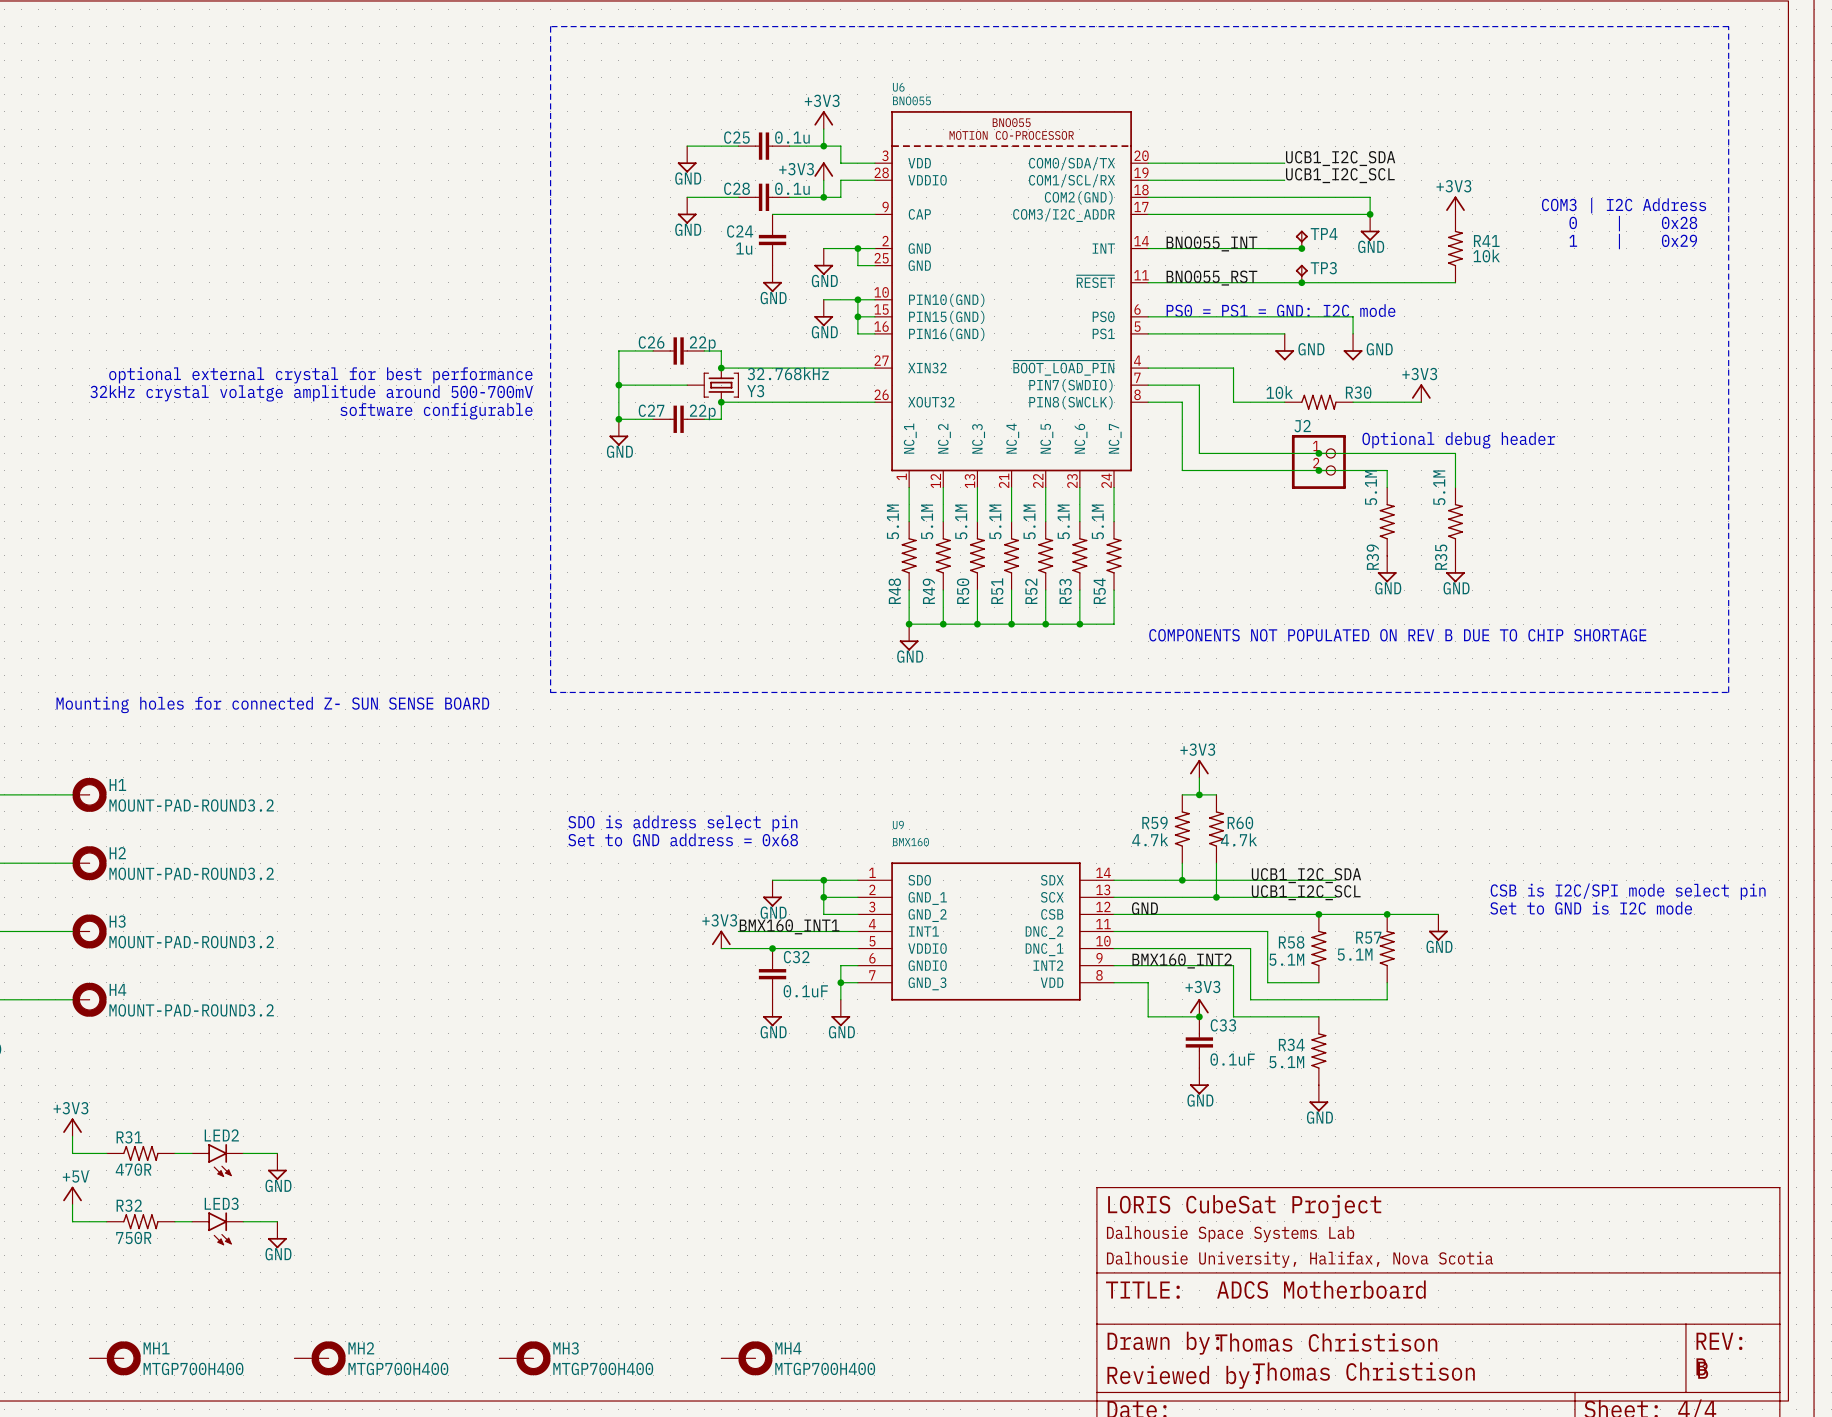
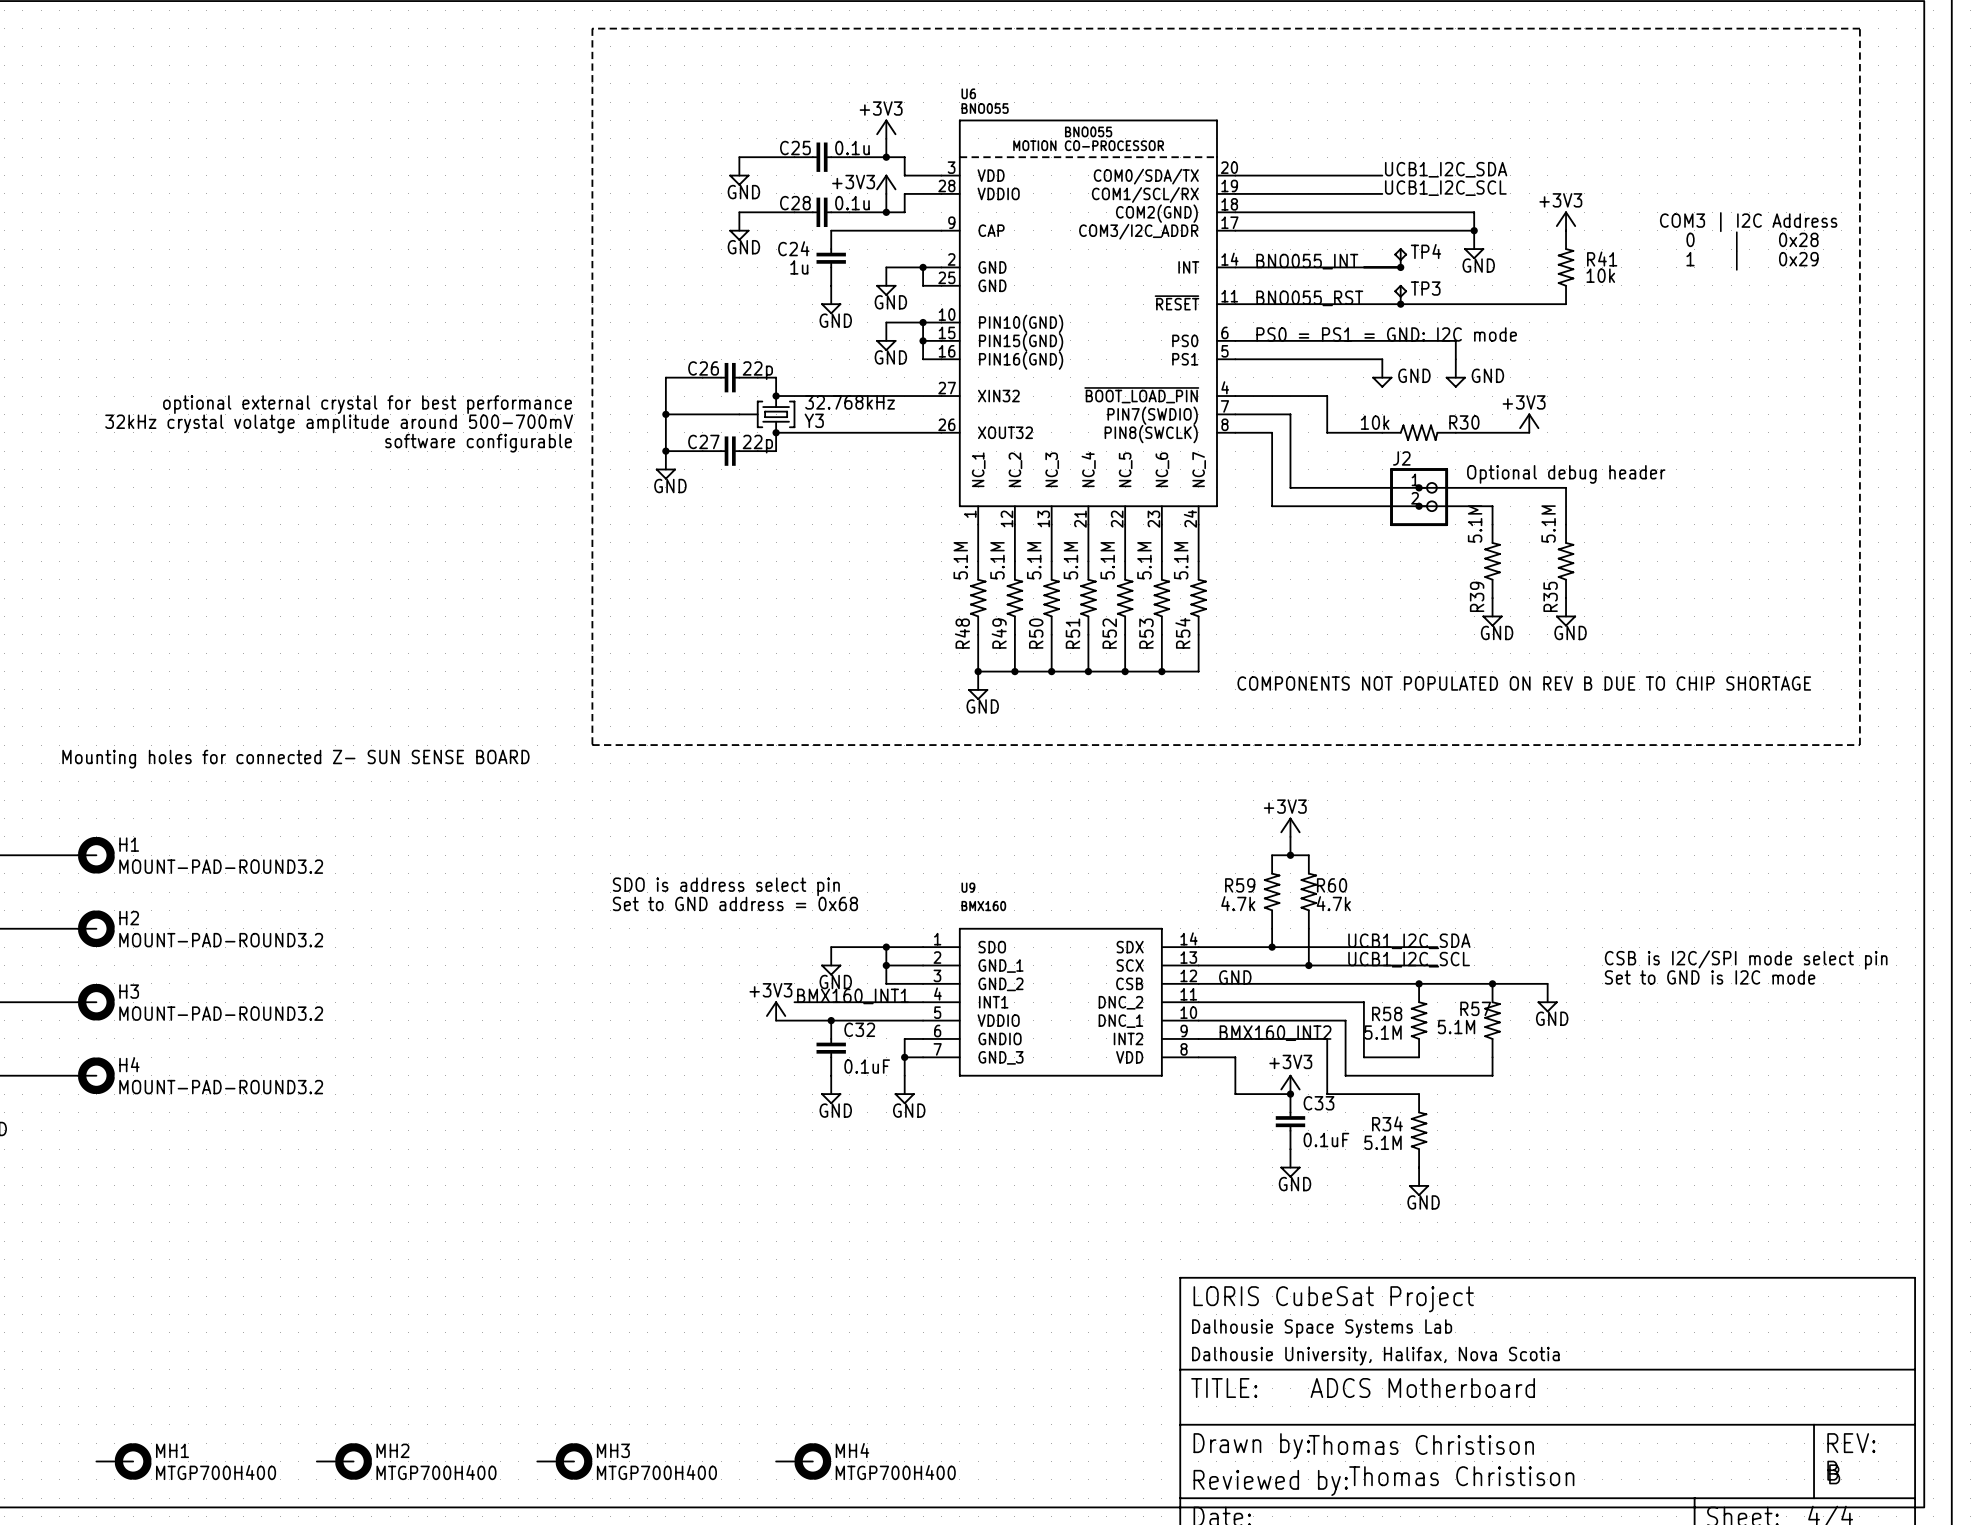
power symbol: +3V3 (72, 1127) -> none
wire: (72, 1136) (72, 1153) (106, 1153) -> none
R31: 470R (140, 1153) -> none
wire: (174, 1153) (192, 1153) -> none
wire: (243, 1153) (277, 1153) -> none
LED2: (217, 1160) -> none
power symbol: GND (277, 1166) -> none
power symbol: +5V (72, 1195) -> none
wire: (72, 1204) (72, 1221) (106, 1221) -> none
R32: 750R (140, 1221) -> none
wire: (174, 1221) (192, 1221) -> none
wire: (243, 1221) (277, 1221) -> none
LED3: (217, 1228) -> none
power symbol: GND (277, 1234) -> none

